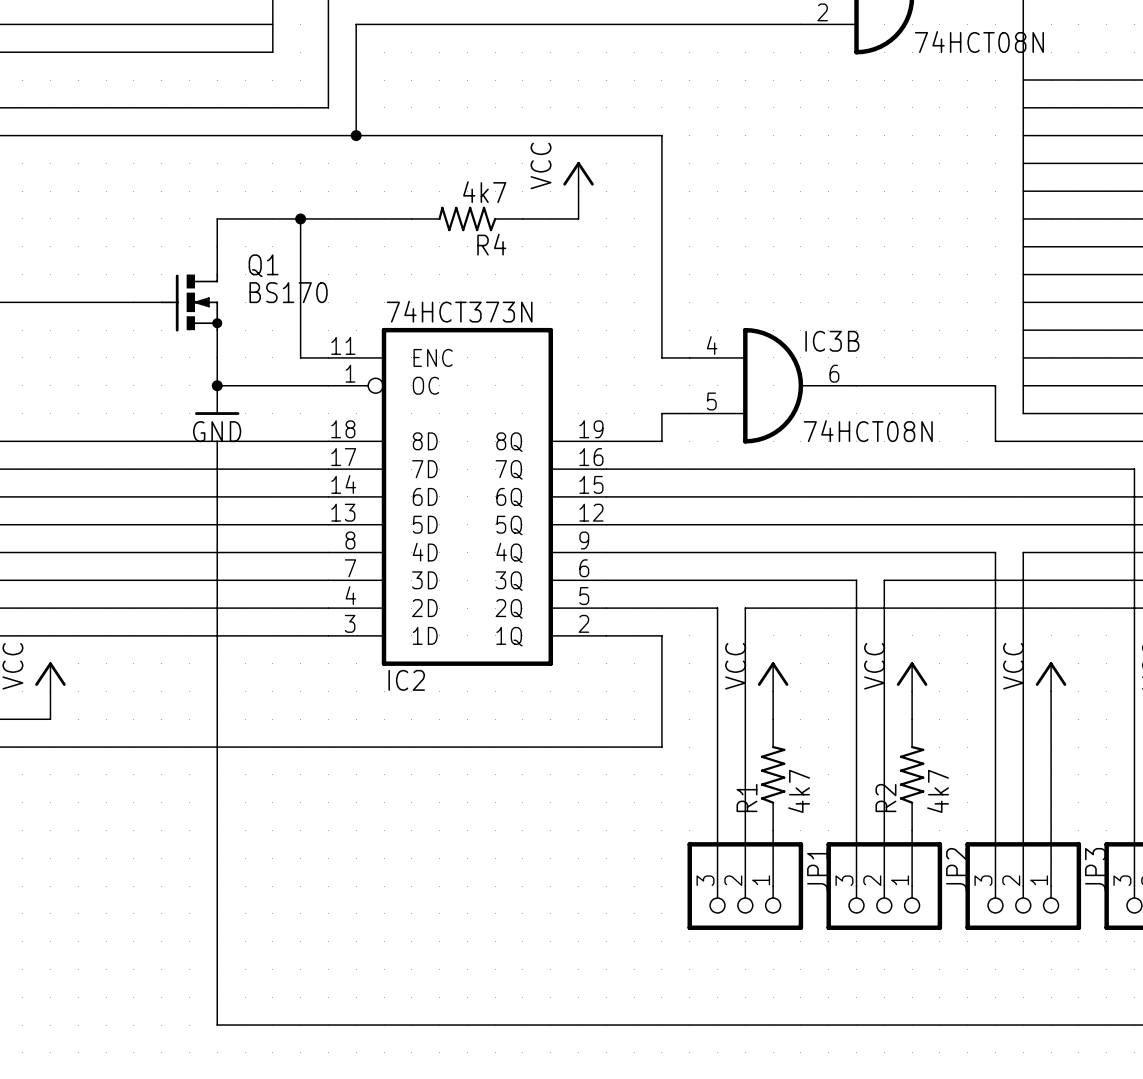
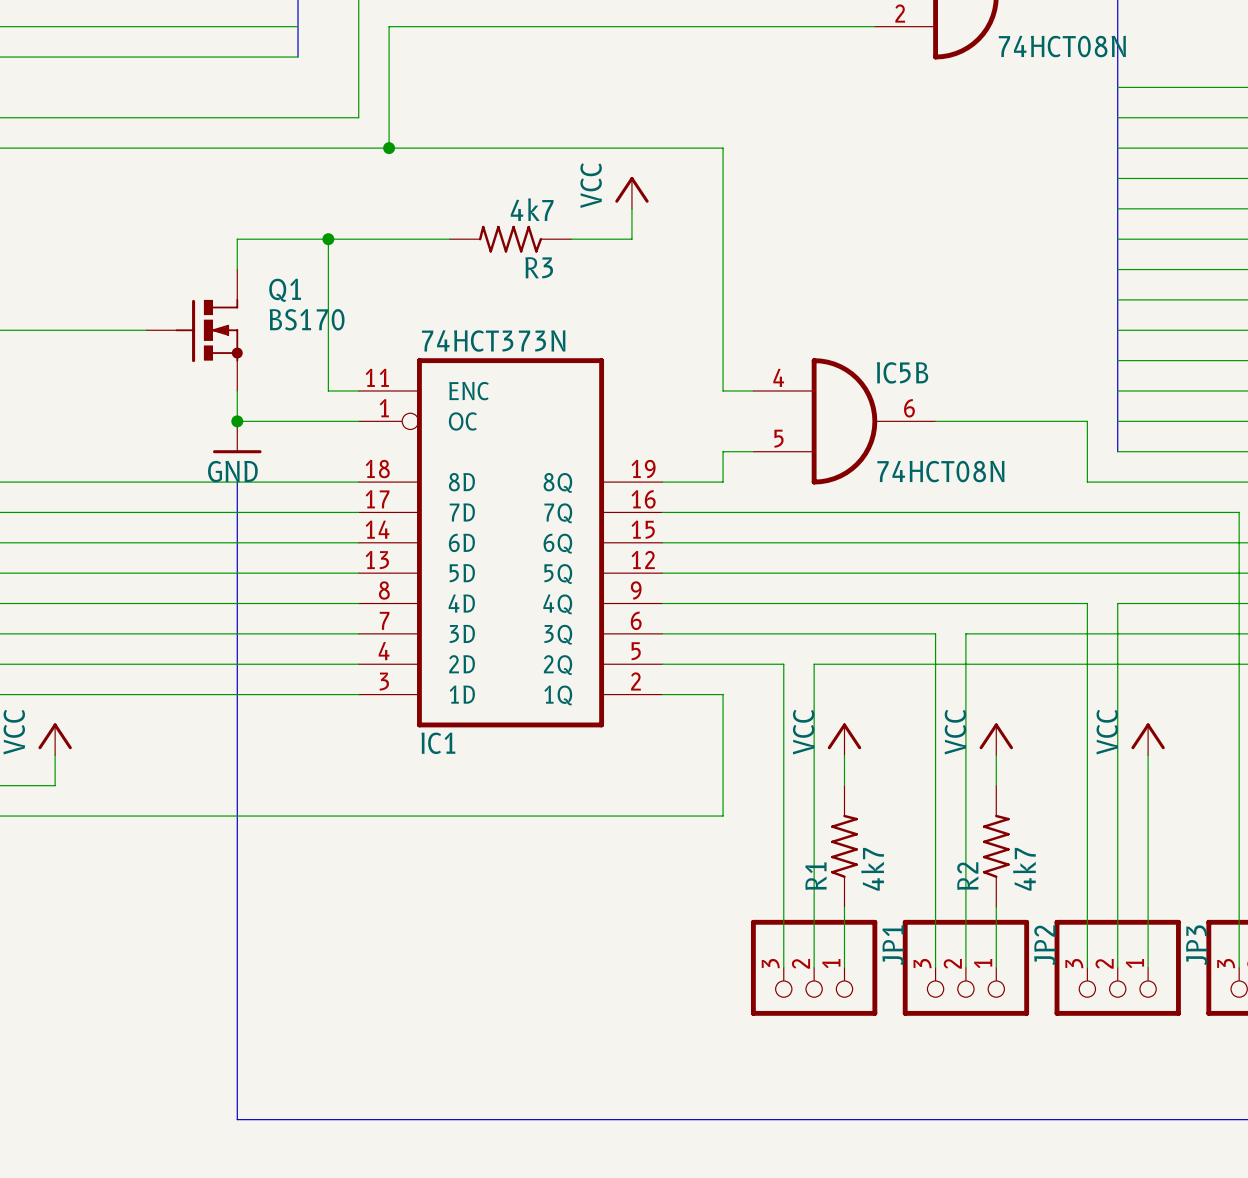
R4 name: R4 (491, 244) -> R3 (539, 267)
IC3B name: IC3B (832, 341) -> IC5B (902, 372)
IC2 name: IC2 (406, 680) -> IC1 (438, 743)

